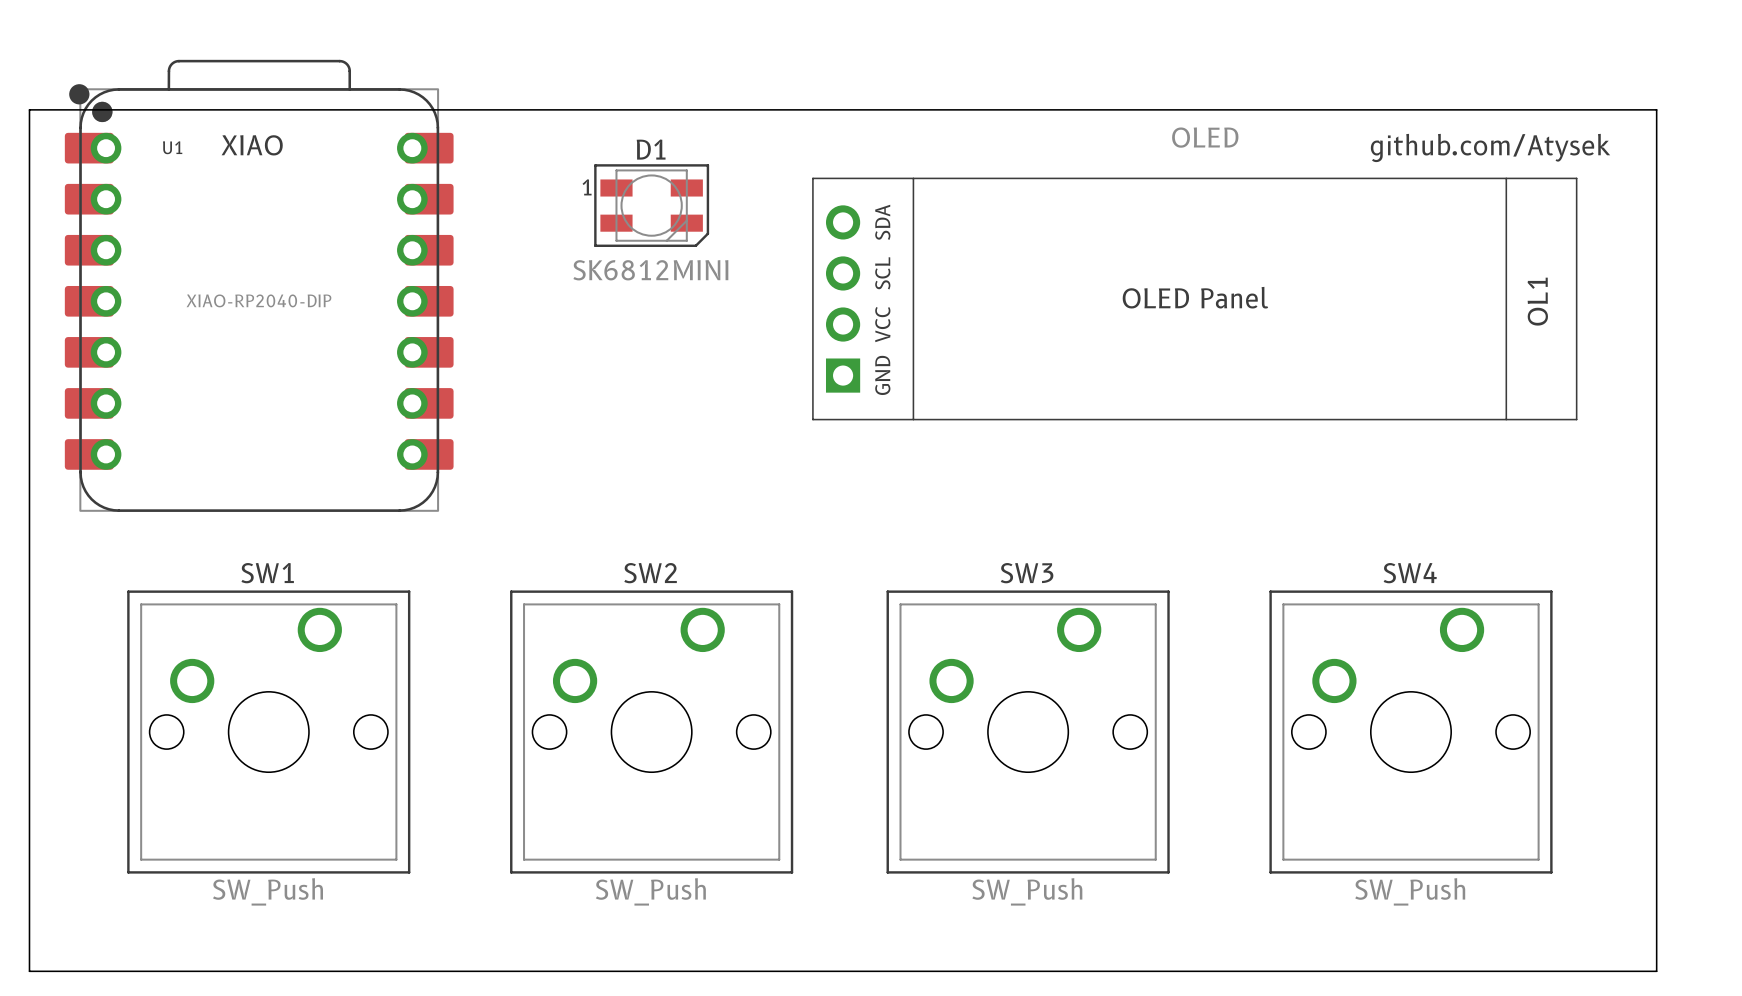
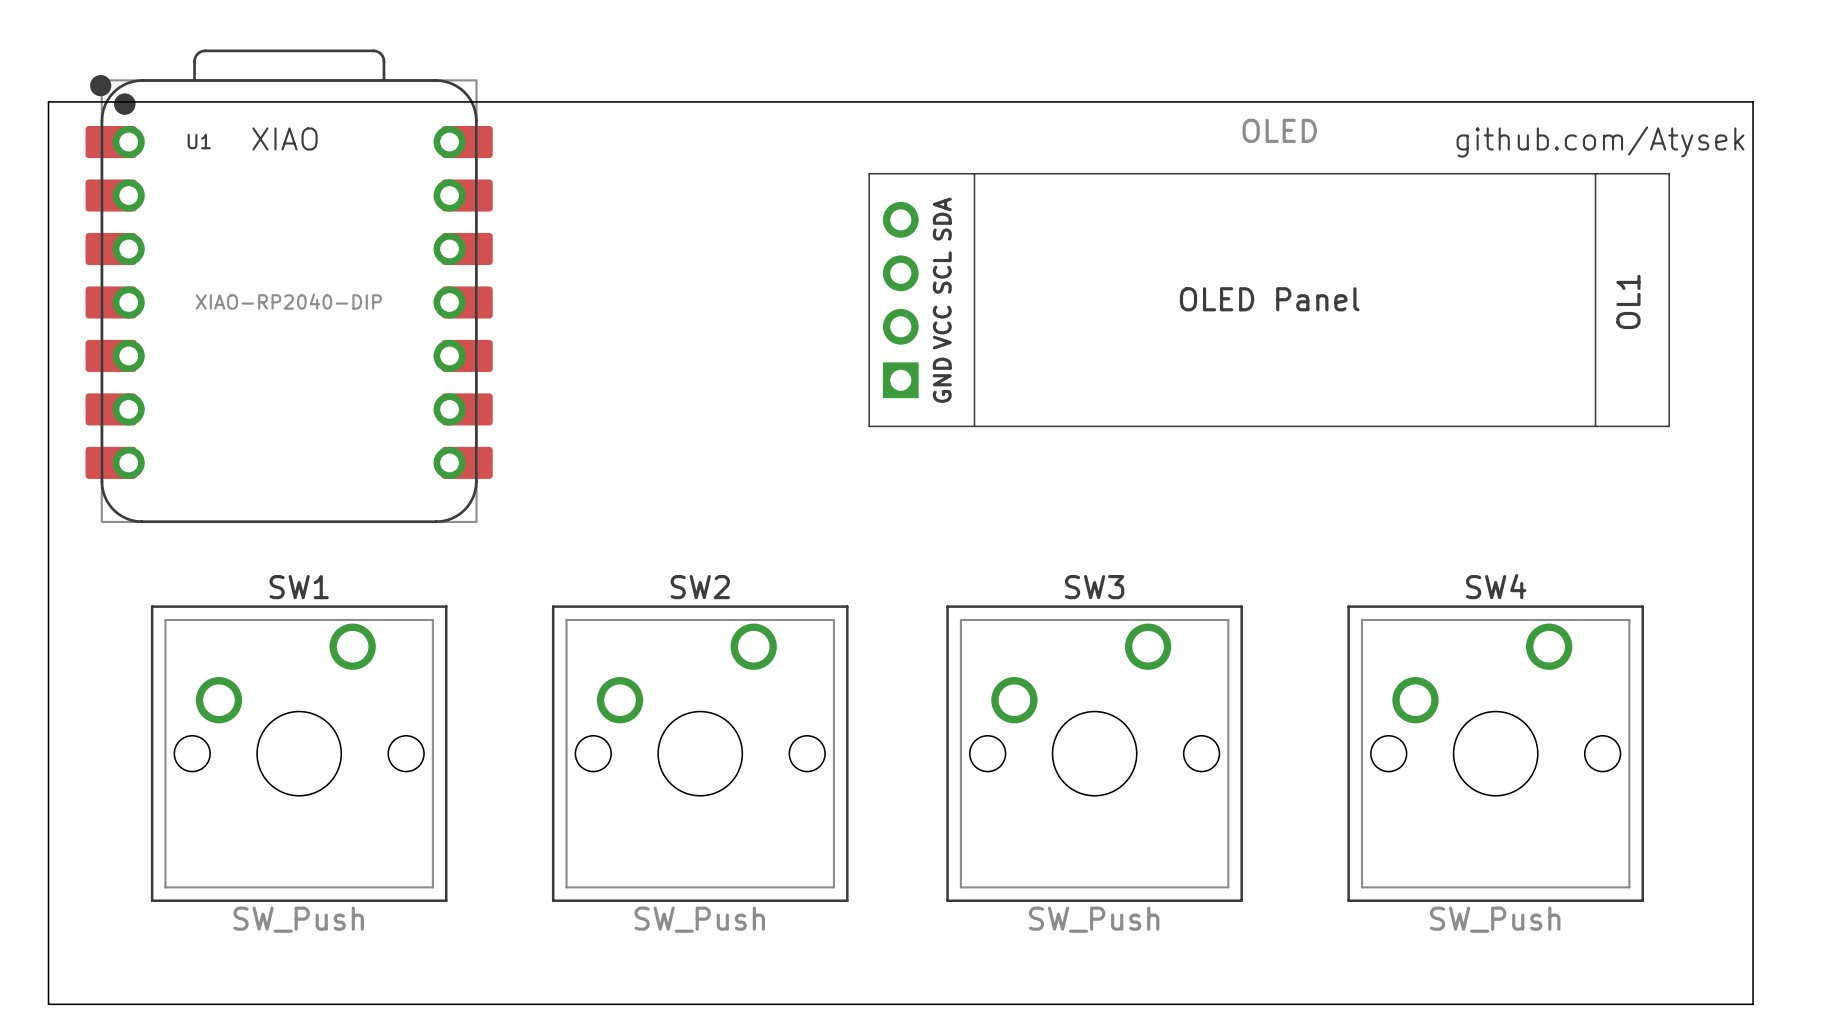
D1: SK6812MINI (651, 205) -> none

